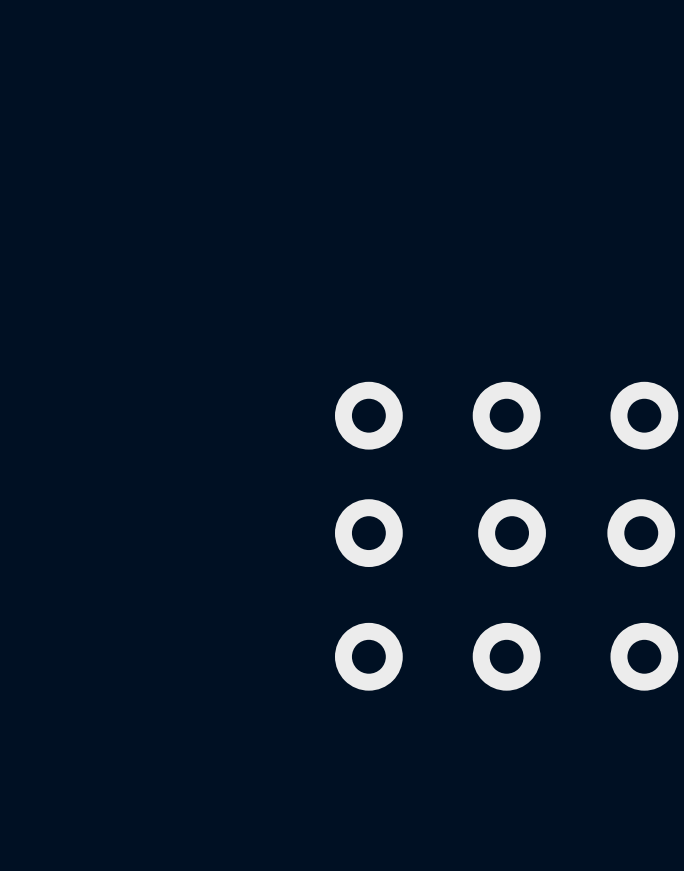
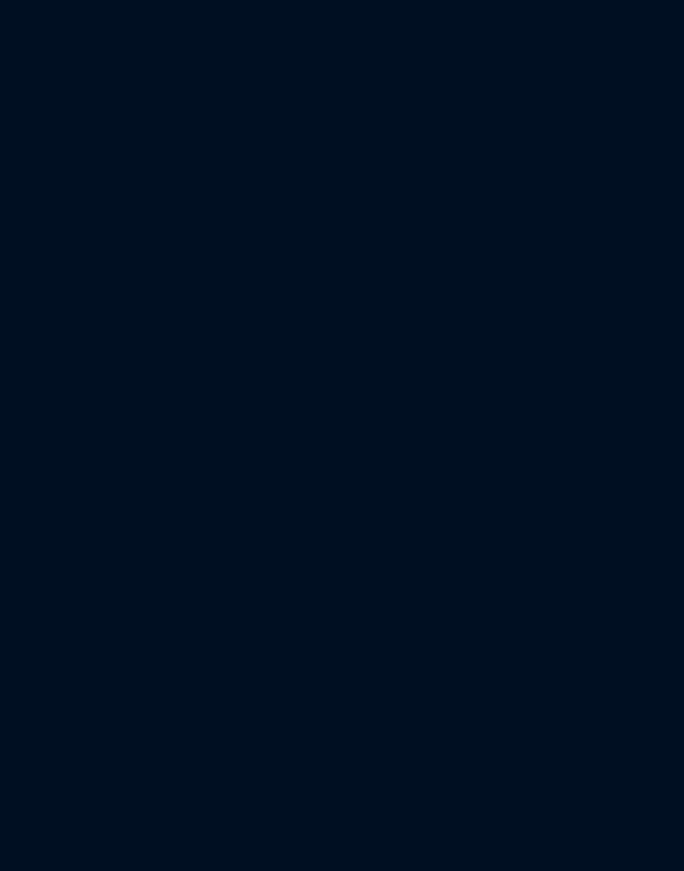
via: (368, 415) -> none
via: (506, 415) -> none
via: (644, 415) -> none
via: (368, 533) -> none
via: (512, 533) -> none
via: (641, 533) -> none
via: (368, 656) -> none
via: (506, 656) -> none
via: (644, 656) -> none

